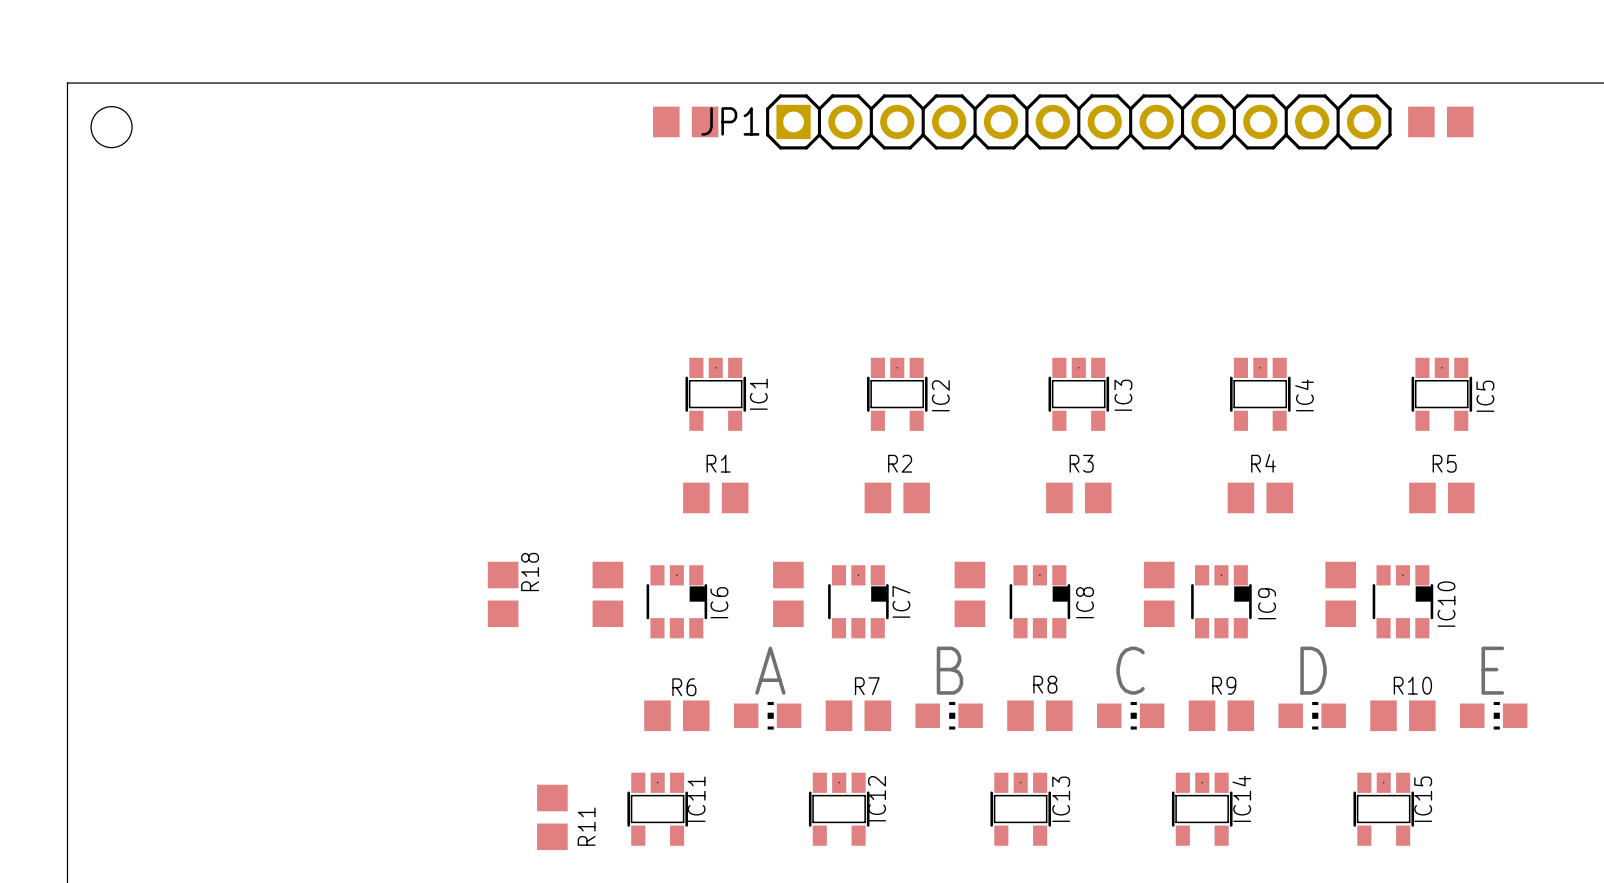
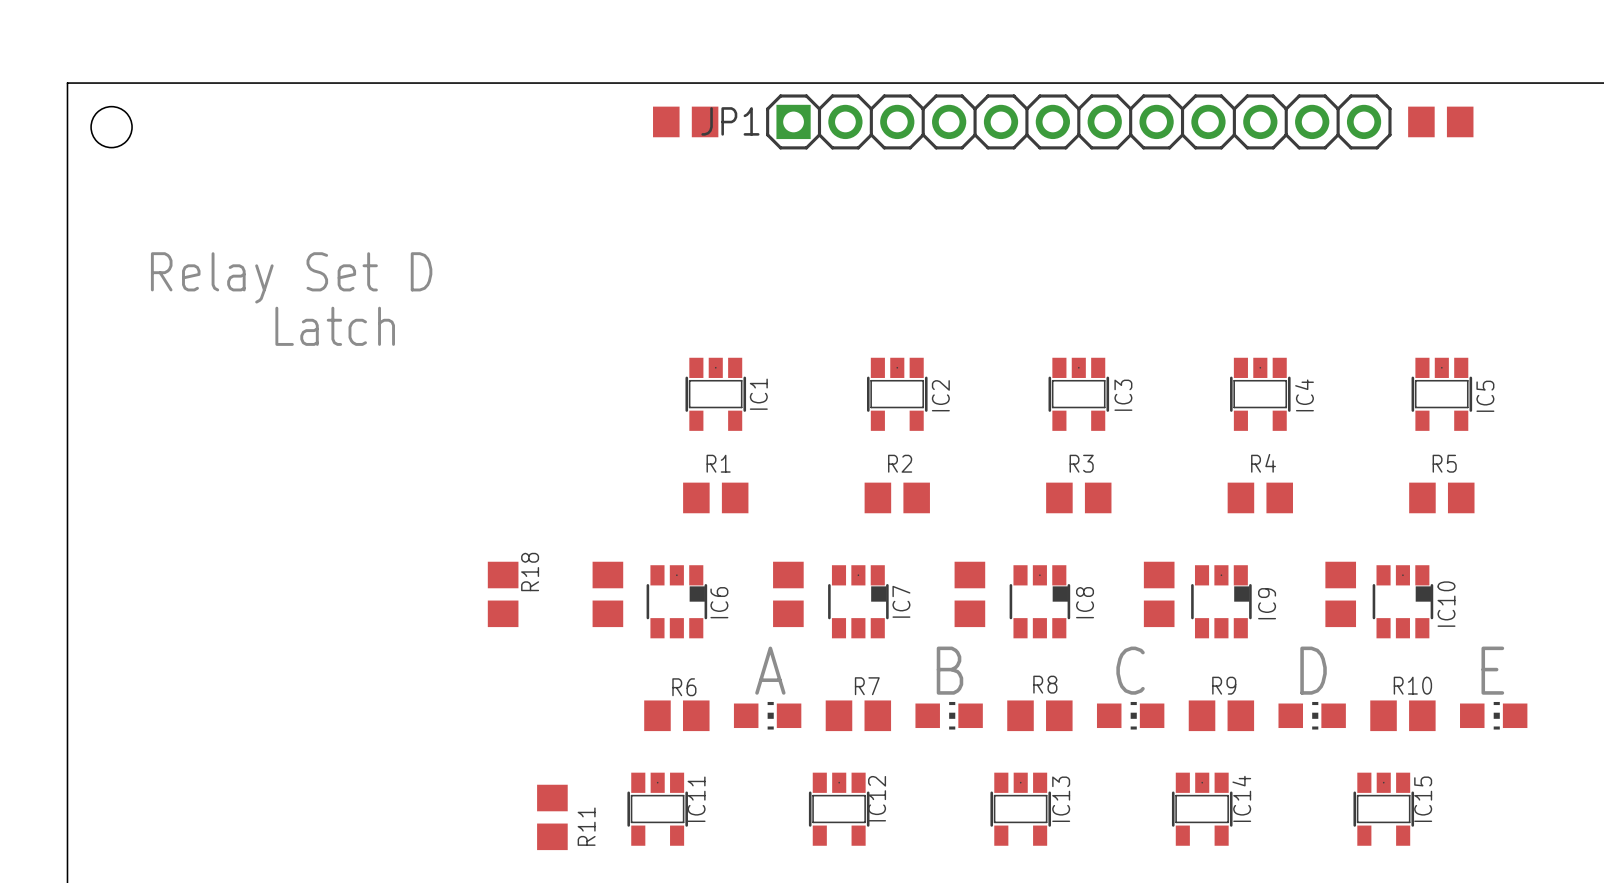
text: none -> Relay Set D (291, 277)
text: none -> Latch (335, 326)

